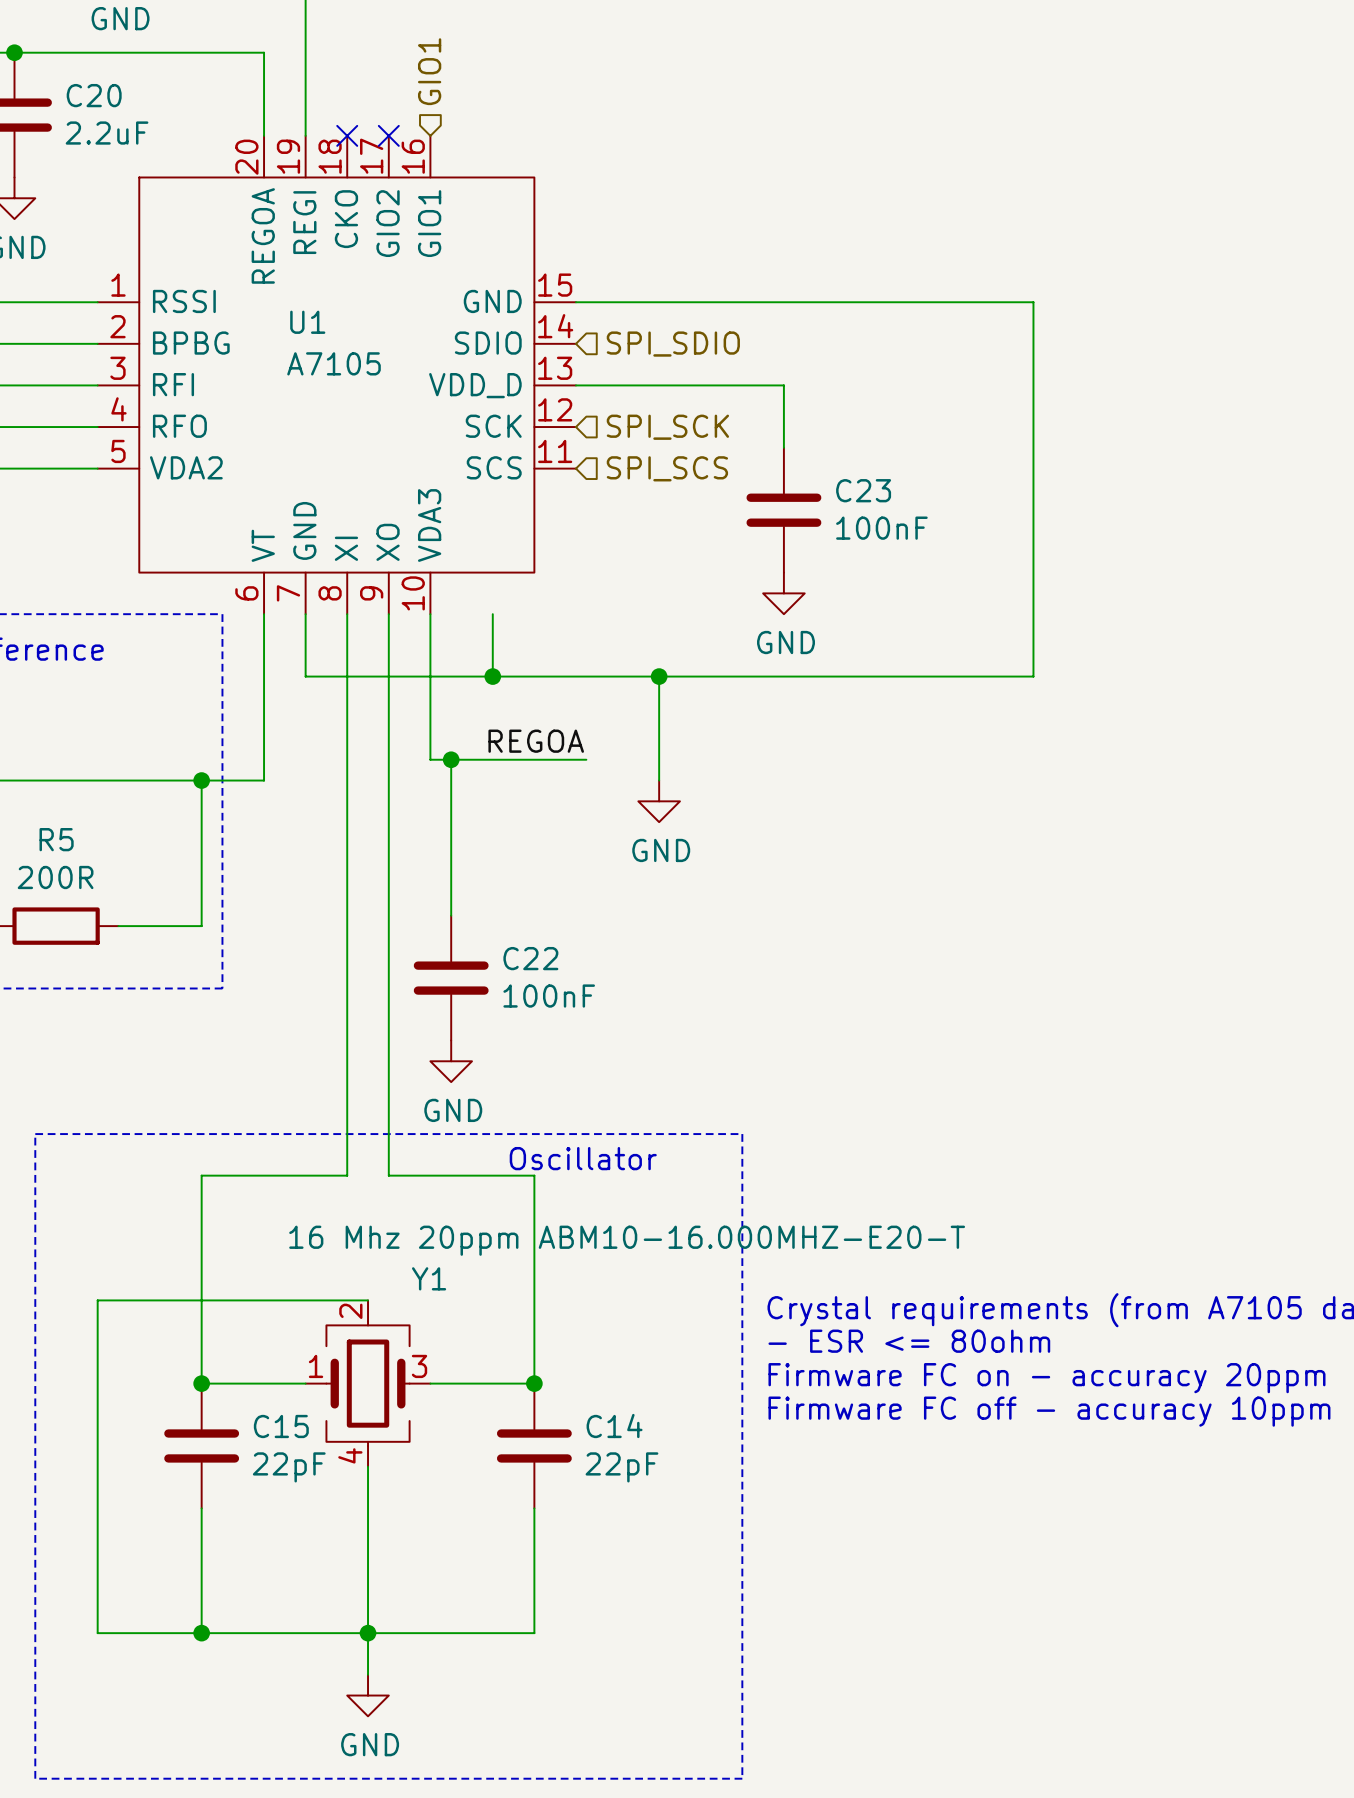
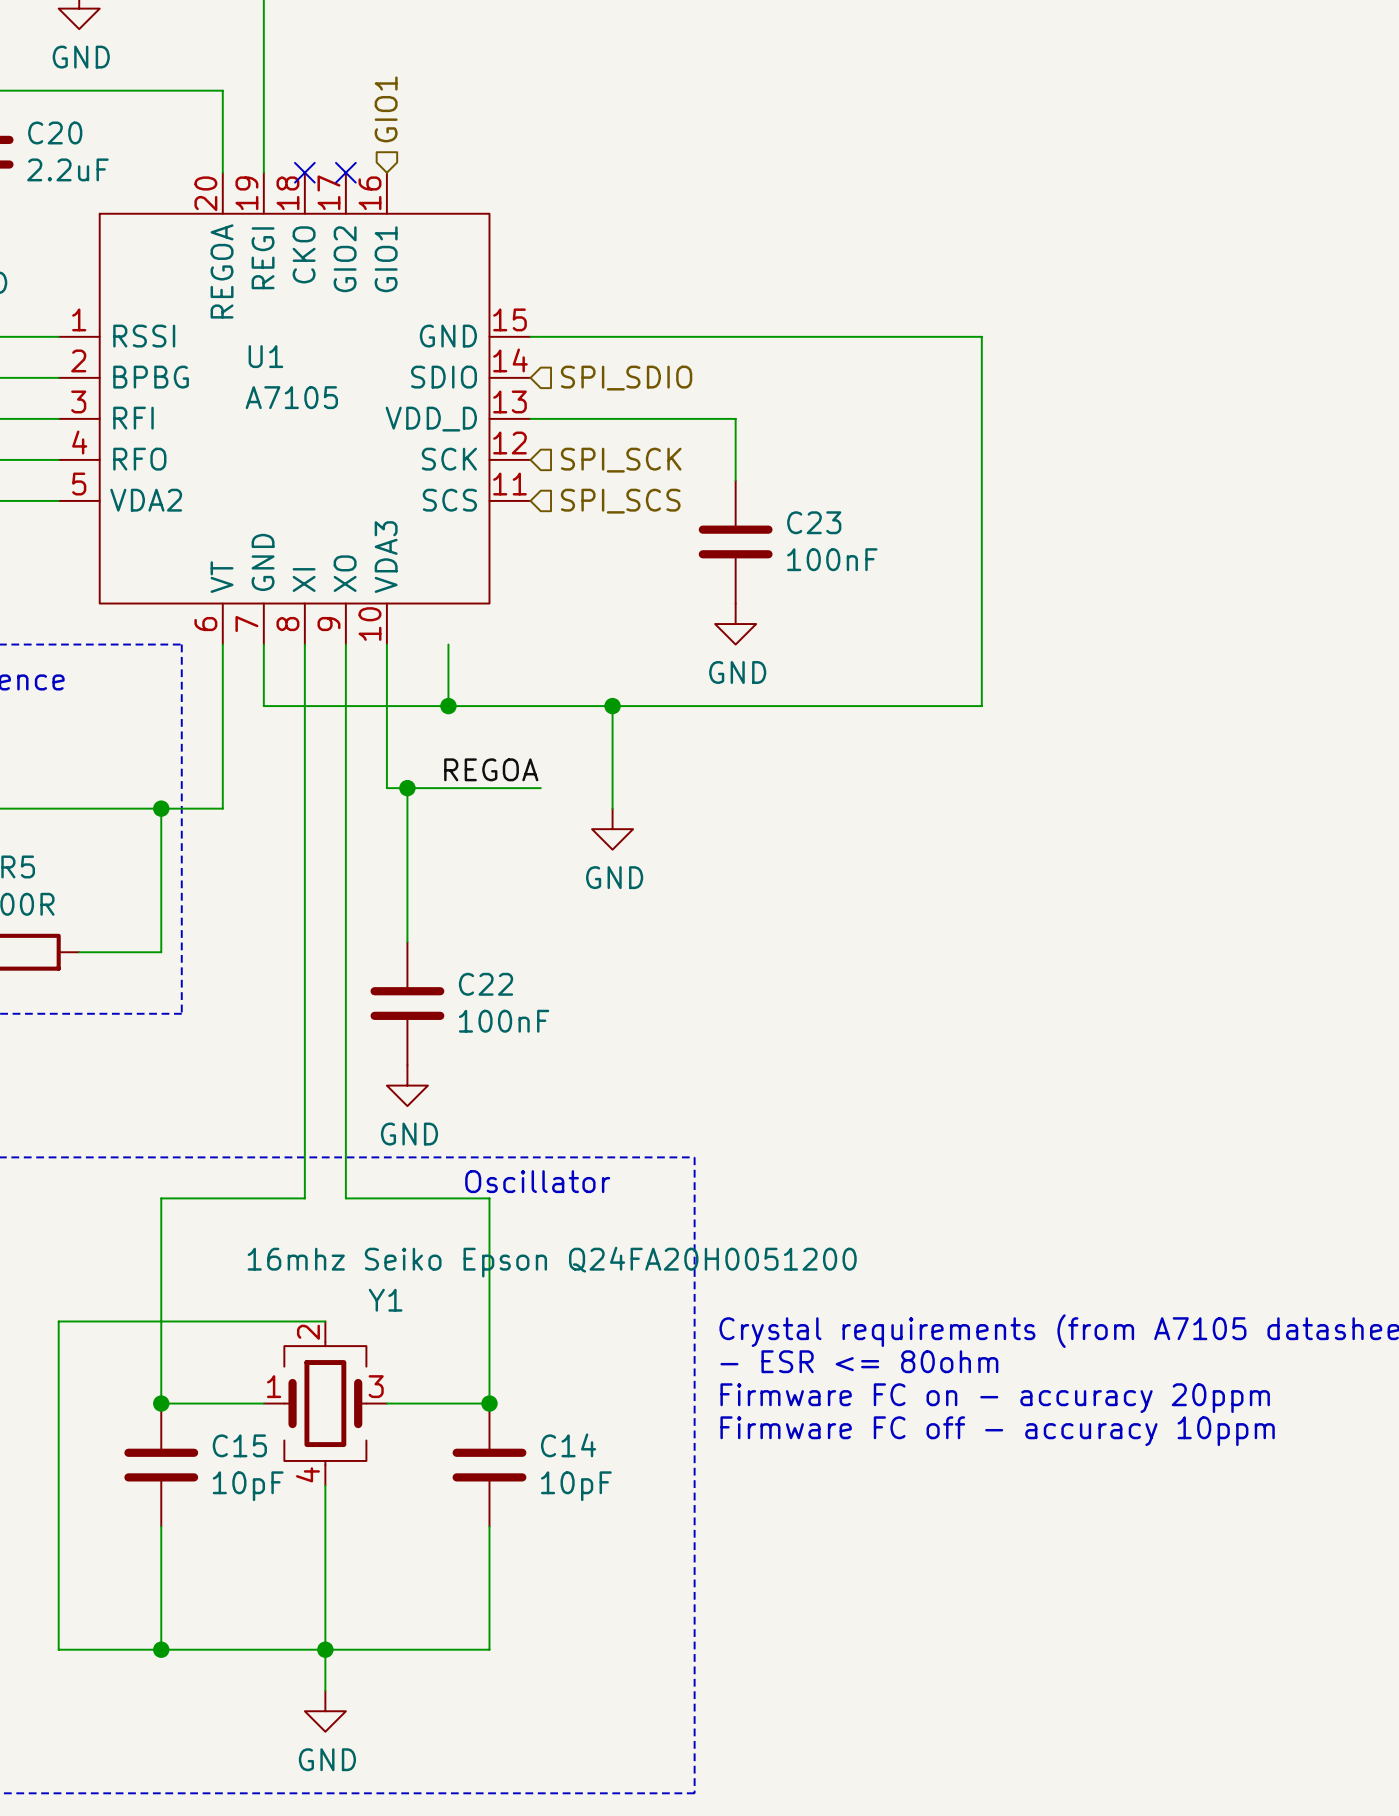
Y1 value: 16 Mhz 20ppm ABM10-16.000MHZ-E20-T (627, 1240) -> 16mhz Seiko Epson Q24FA20H0051200 (552, 1262)
C15 value: 22pF (289, 1467) -> 10pF (248, 1486)
C14 value: 22pF (621, 1467) -> 10pF (576, 1486)

